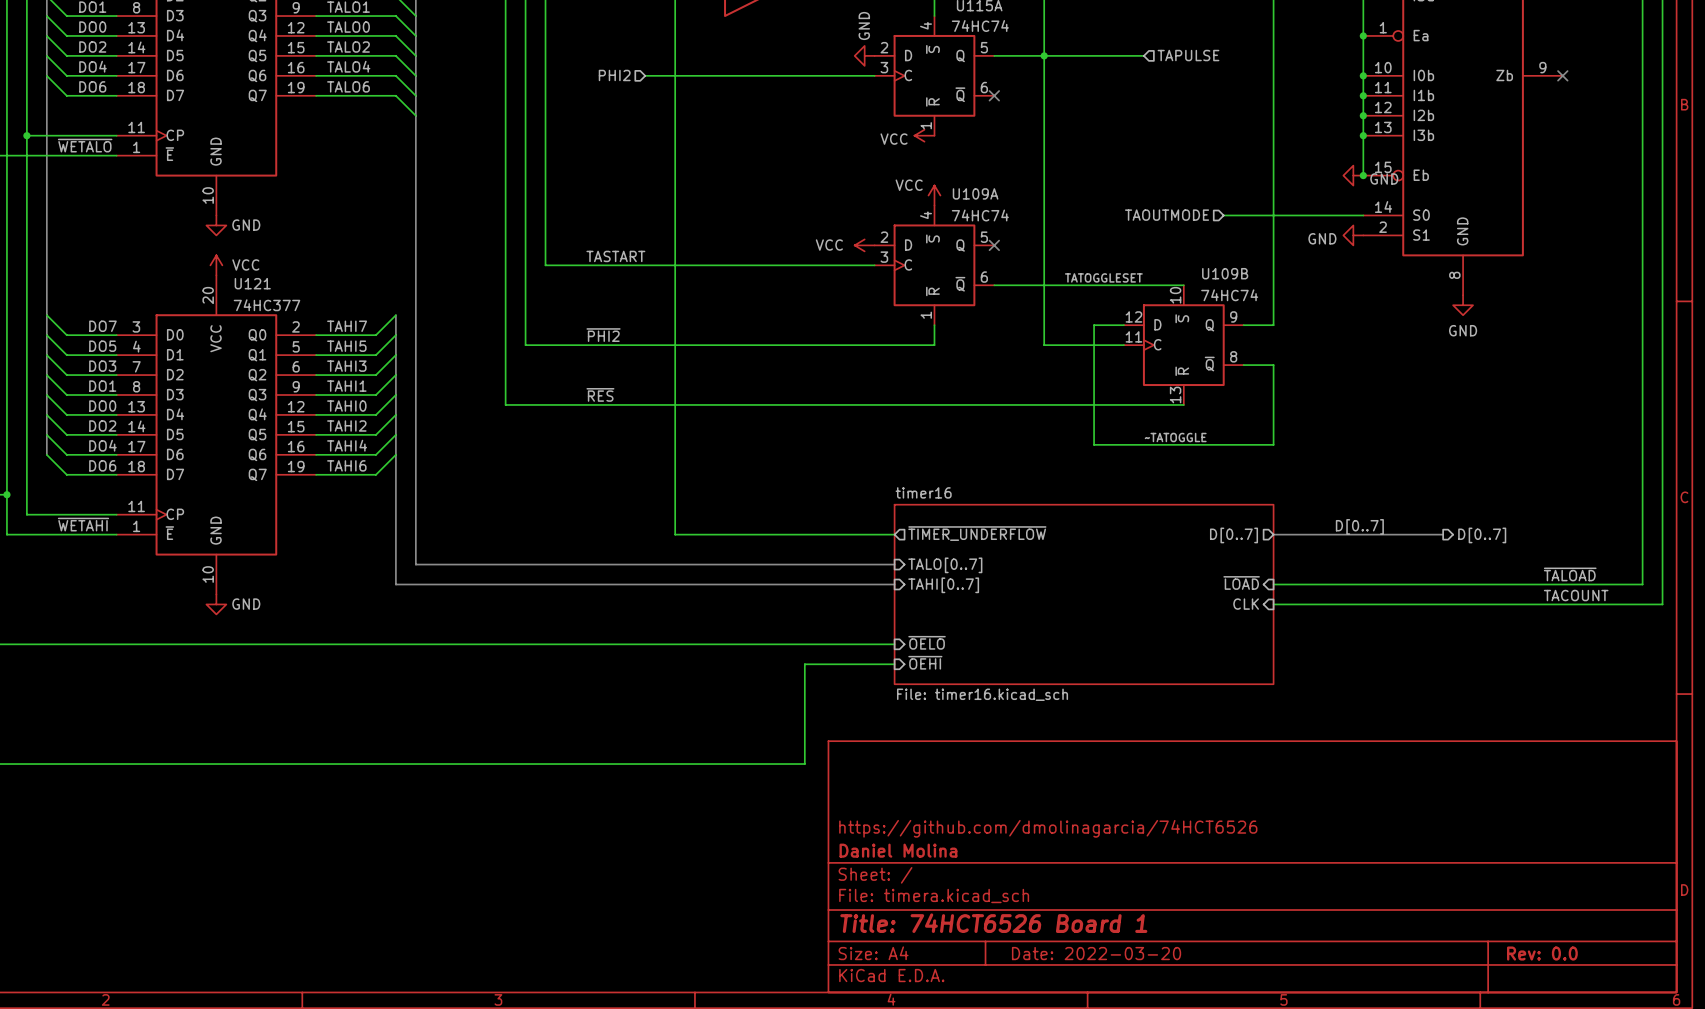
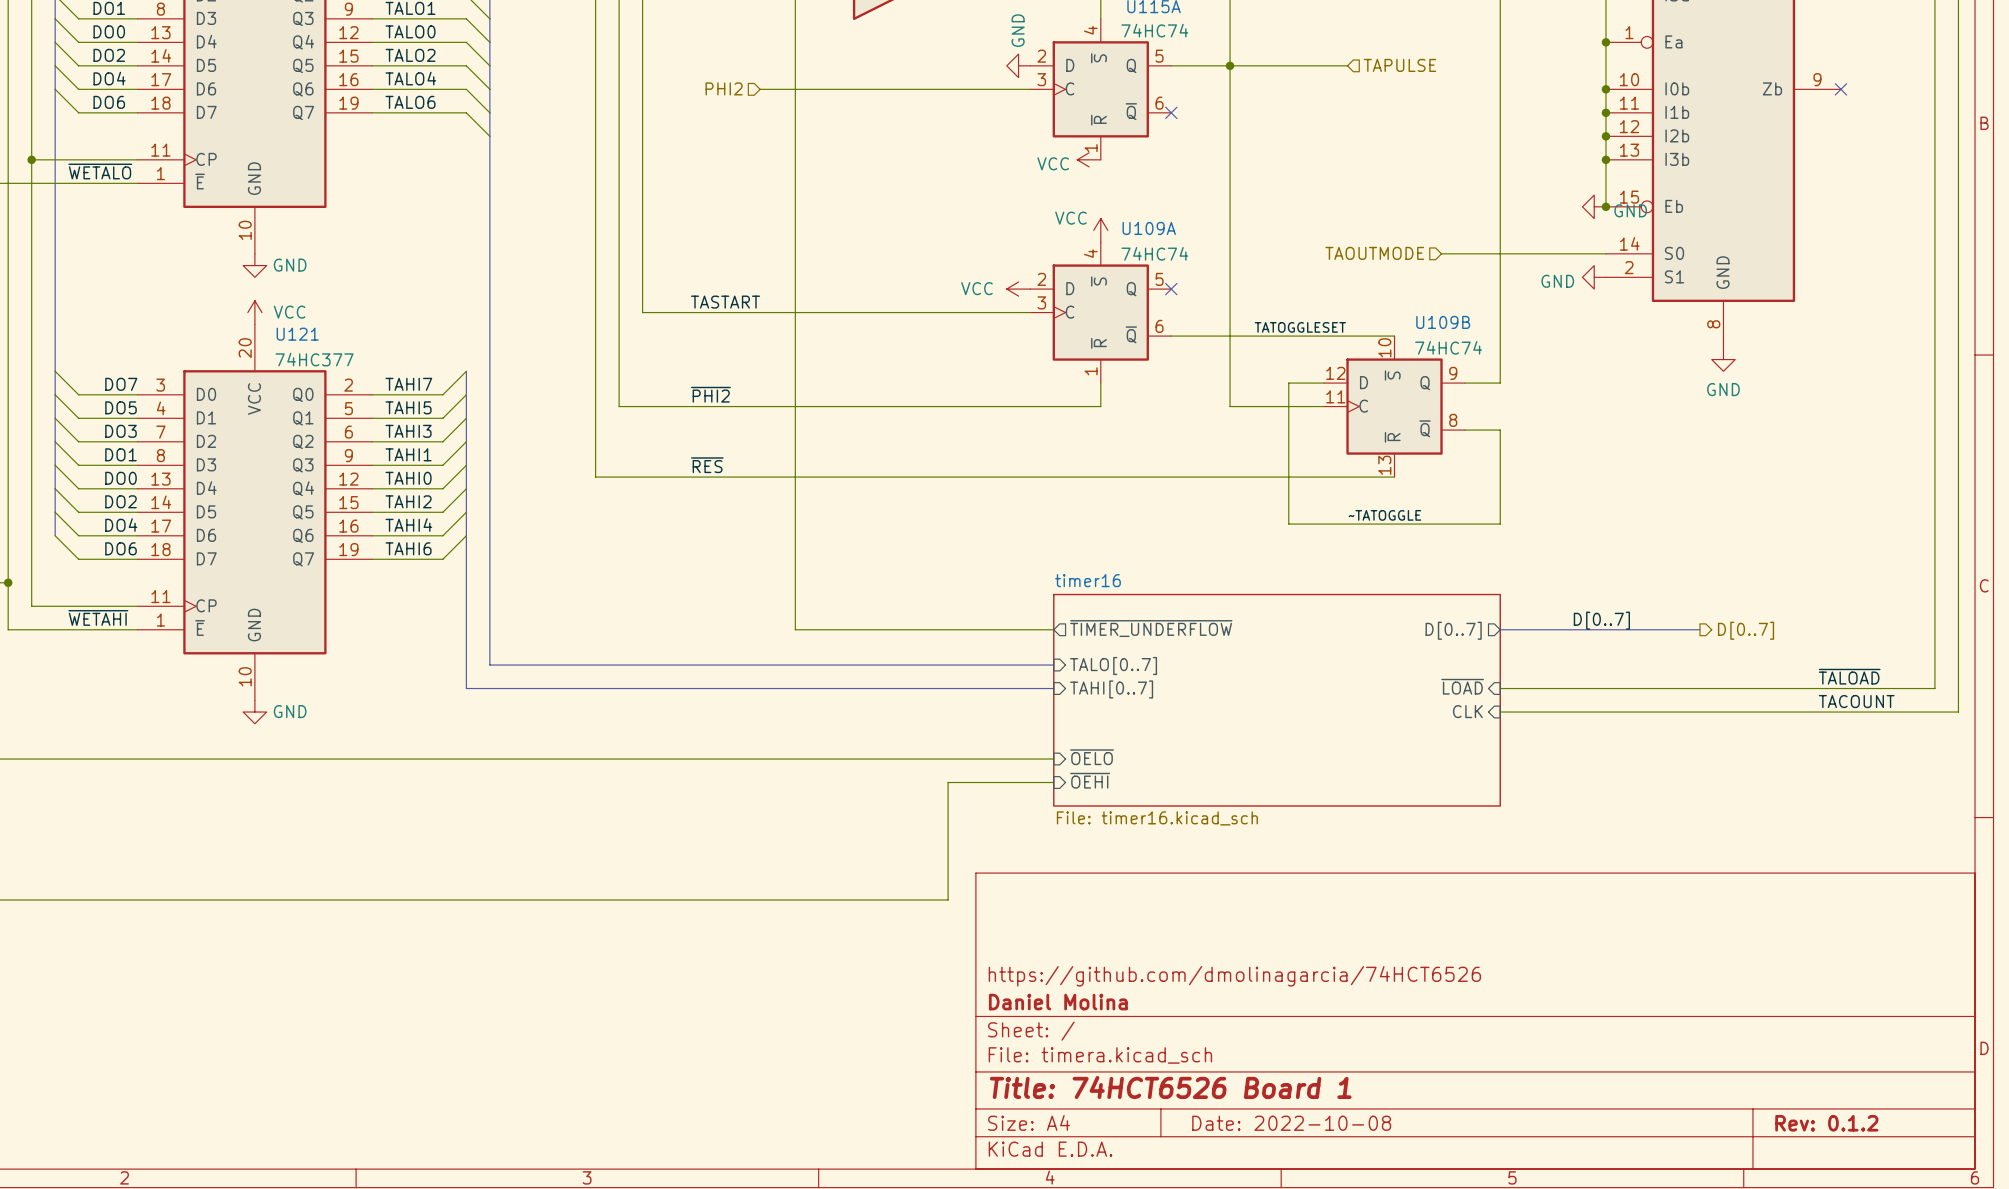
title block: Date: 2022-03-20 (1096, 953) -> Date: 2022-10-08 (1291, 1123)
title block: Rev: 0.0 (1542, 953) -> Rev: 0.1.2 (1826, 1123)

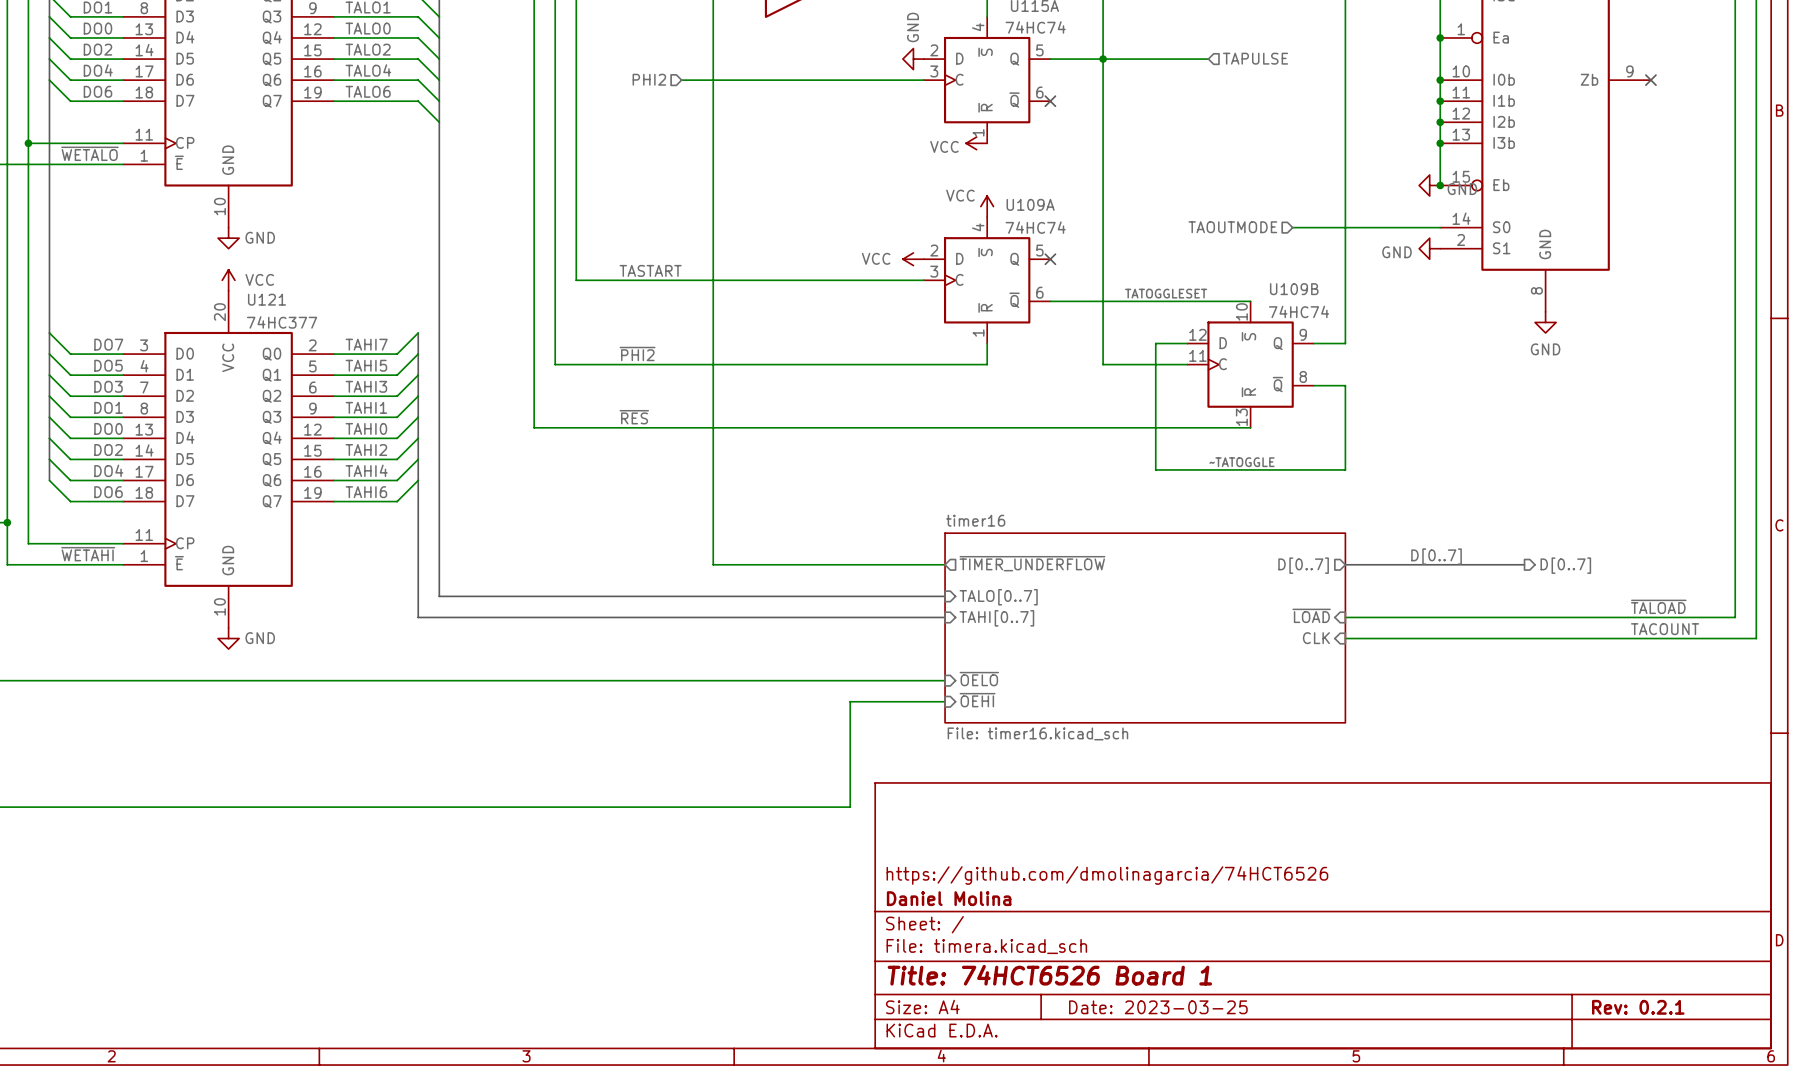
title block: Date: 2022-10-08 (1291, 1123) -> Date: 2023-03-25 (1158, 1007)
title block: Rev: 0.1.2 (1826, 1123) -> Rev: 0.2.1 (1638, 1007)

